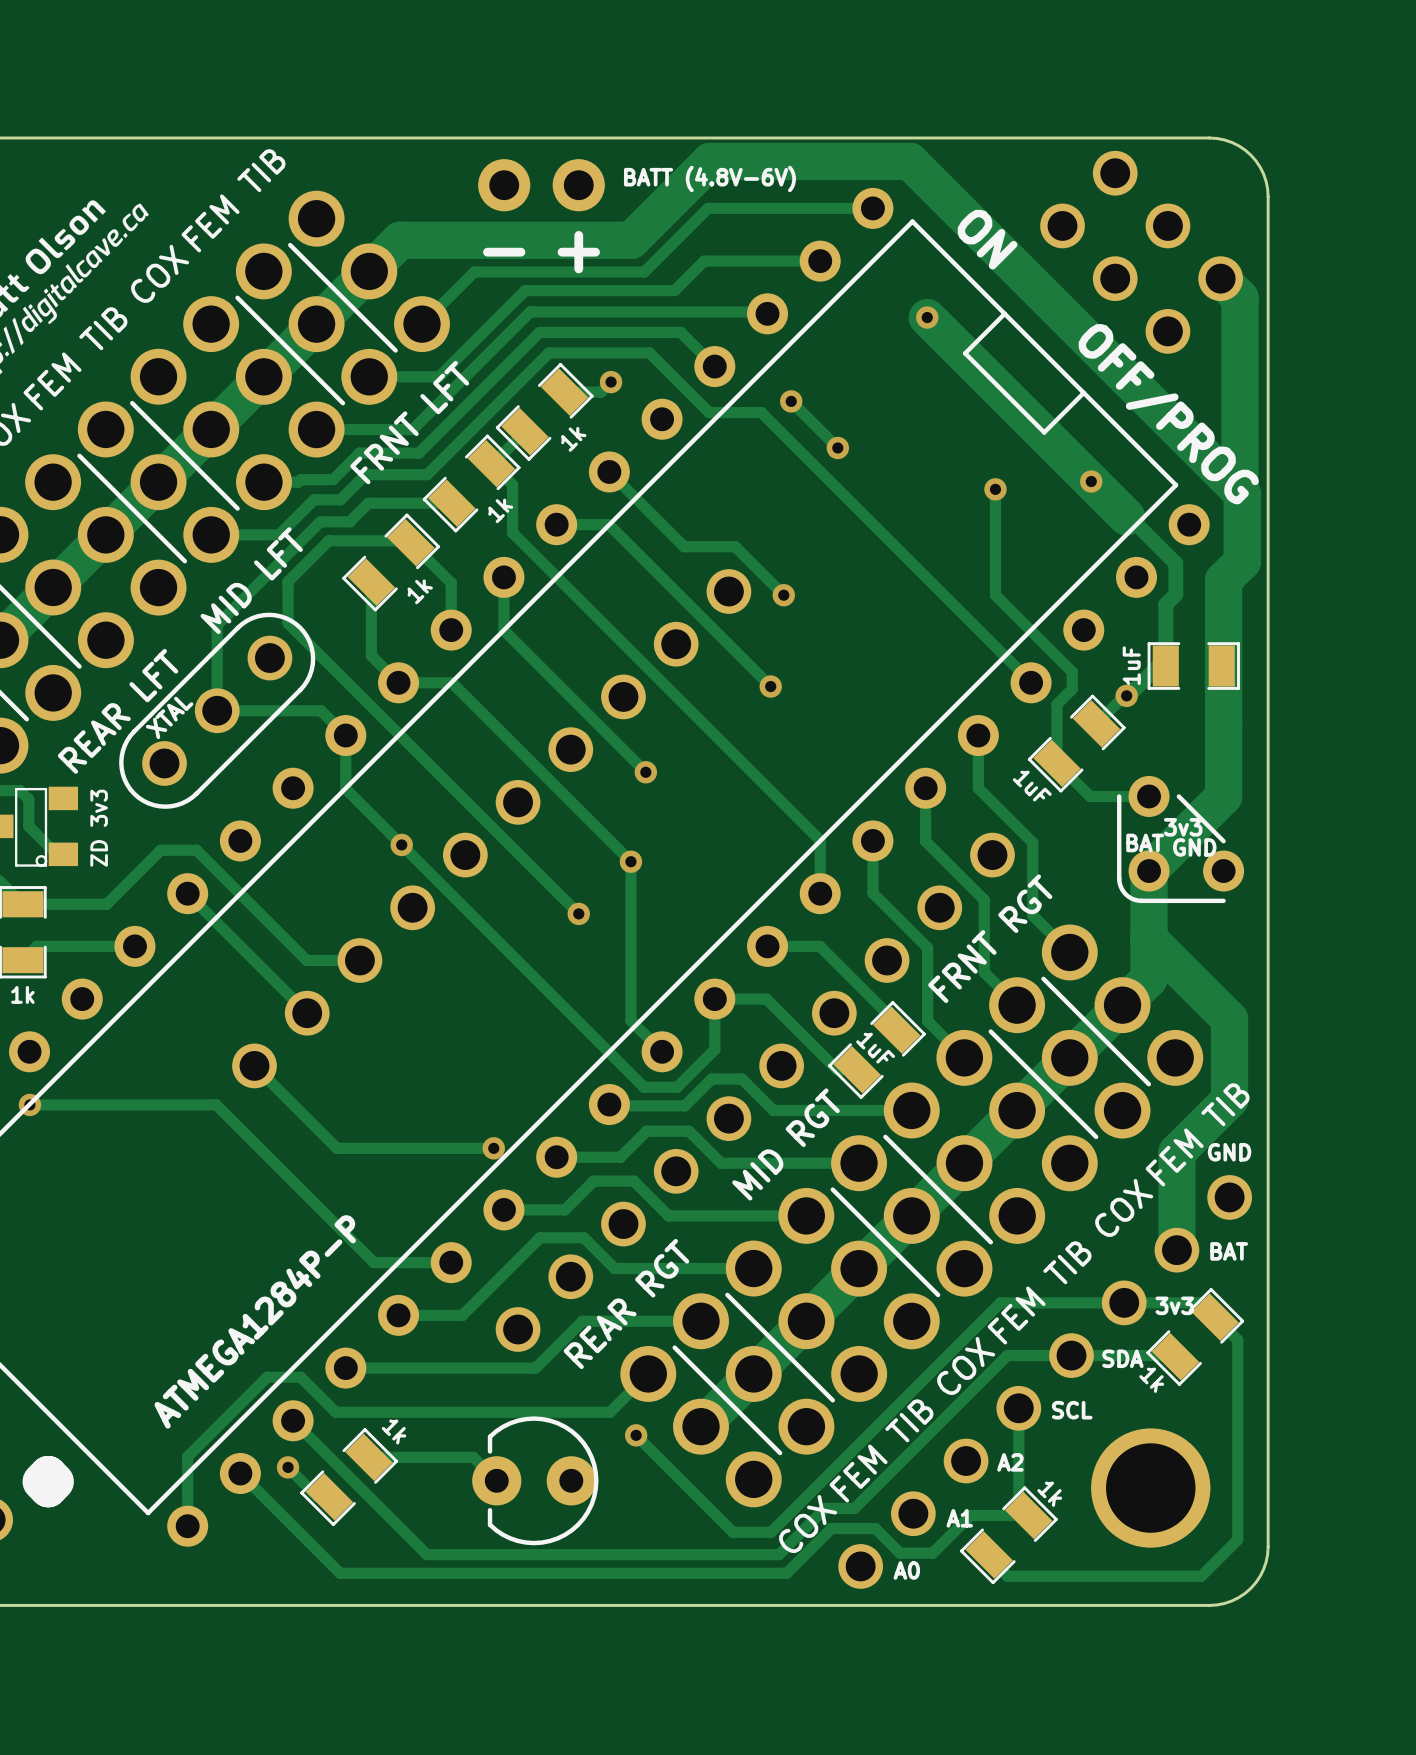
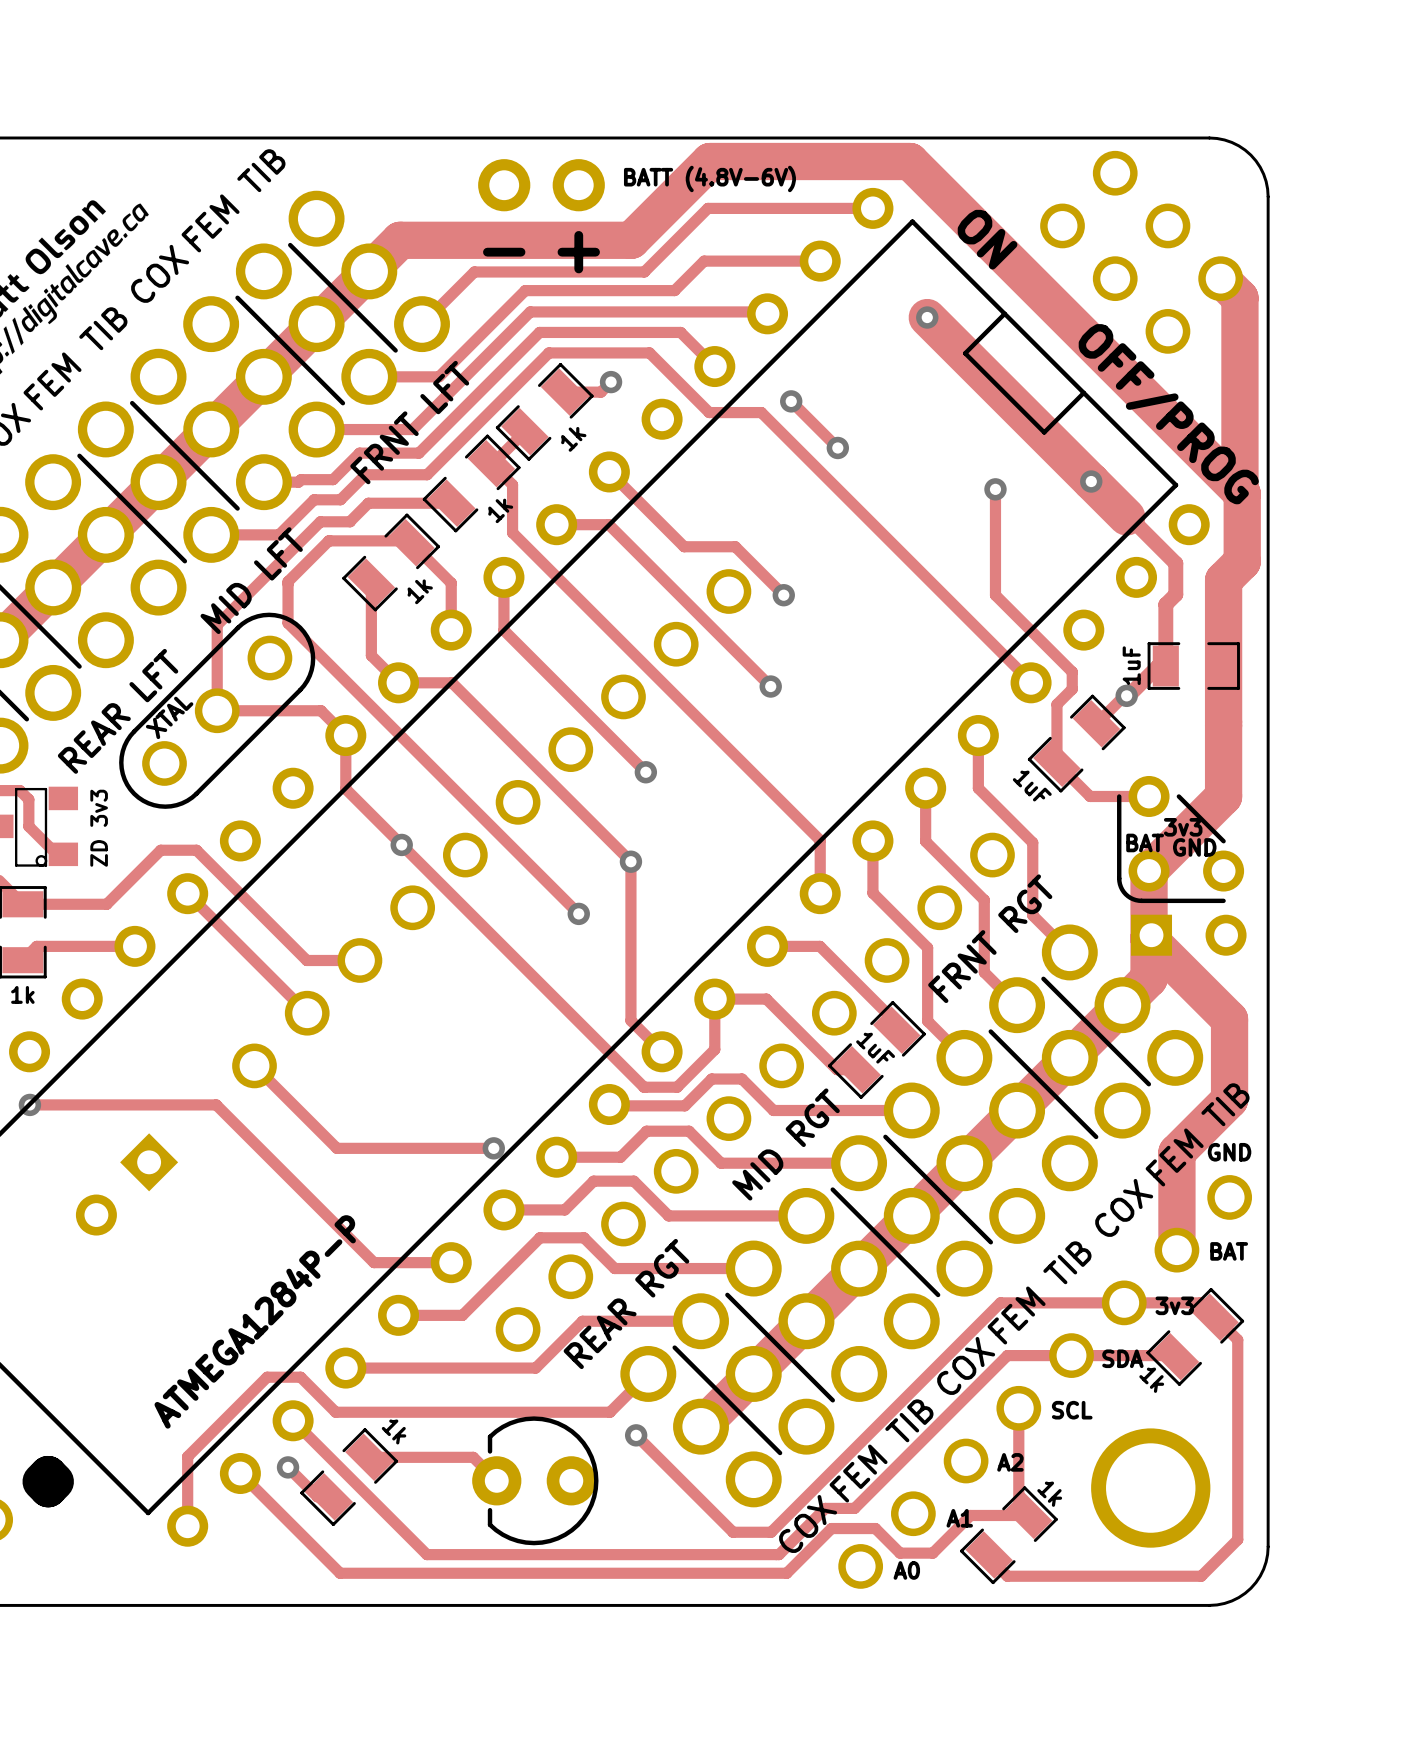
part: none -> (1188, 935)
part: none -> (127, 1184)

